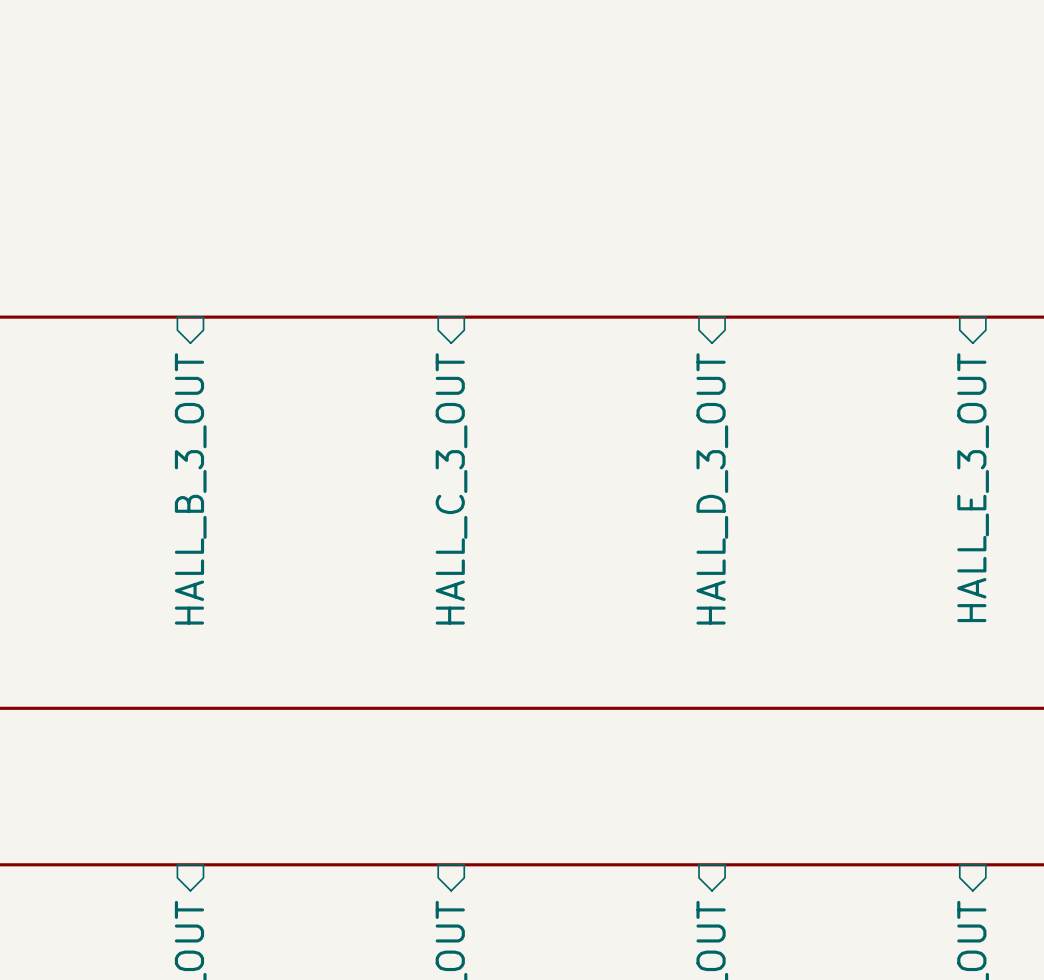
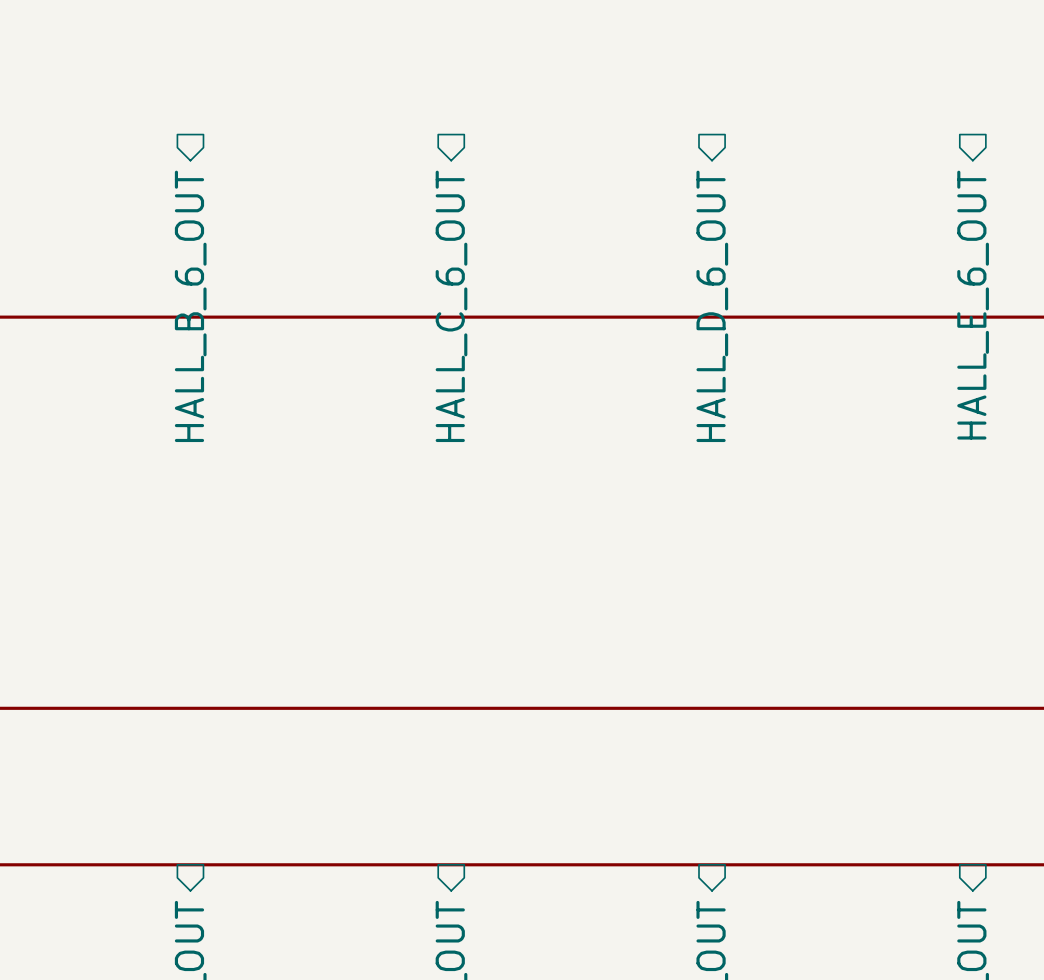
sheet pin: HALL_E_3_OUT (973, 487) -> HALL_E_6_OUT (973, 305)
sheet pin: HALL_B_3_OUT (190, 488) -> HALL_B_6_OUT (190, 306)
sheet pin: HALL_C_3_OUT (451, 488) -> HALL_C_6_OUT (451, 306)
sheet pin: HALL_D_3_OUT (712, 488) -> HALL_D_6_OUT (712, 306)

